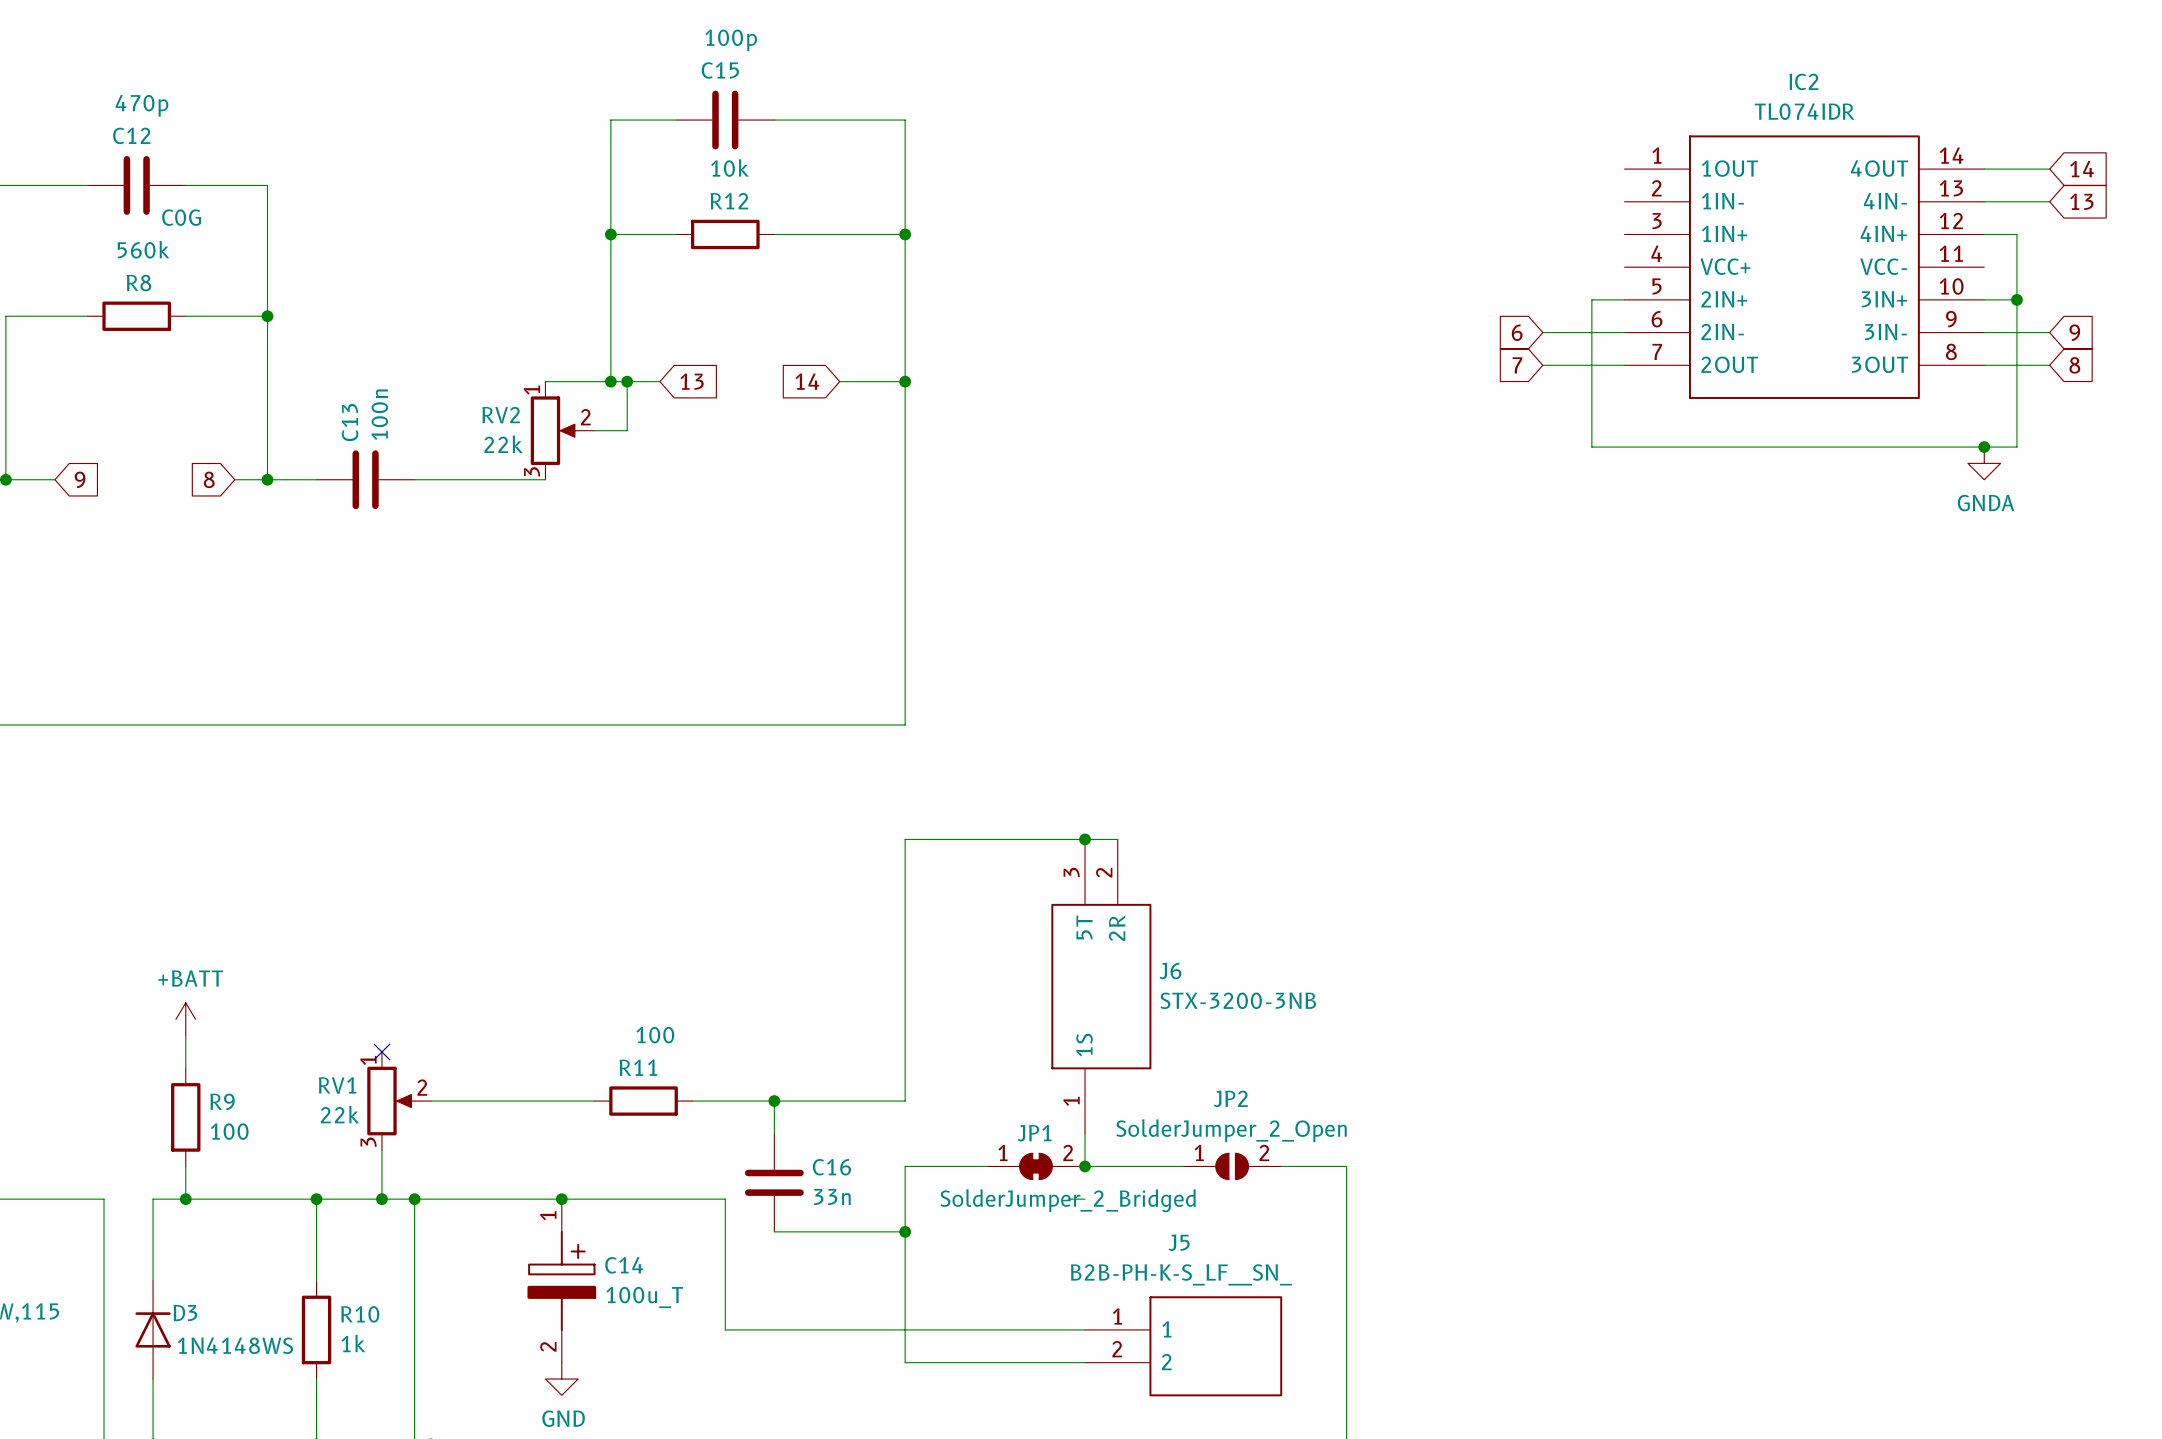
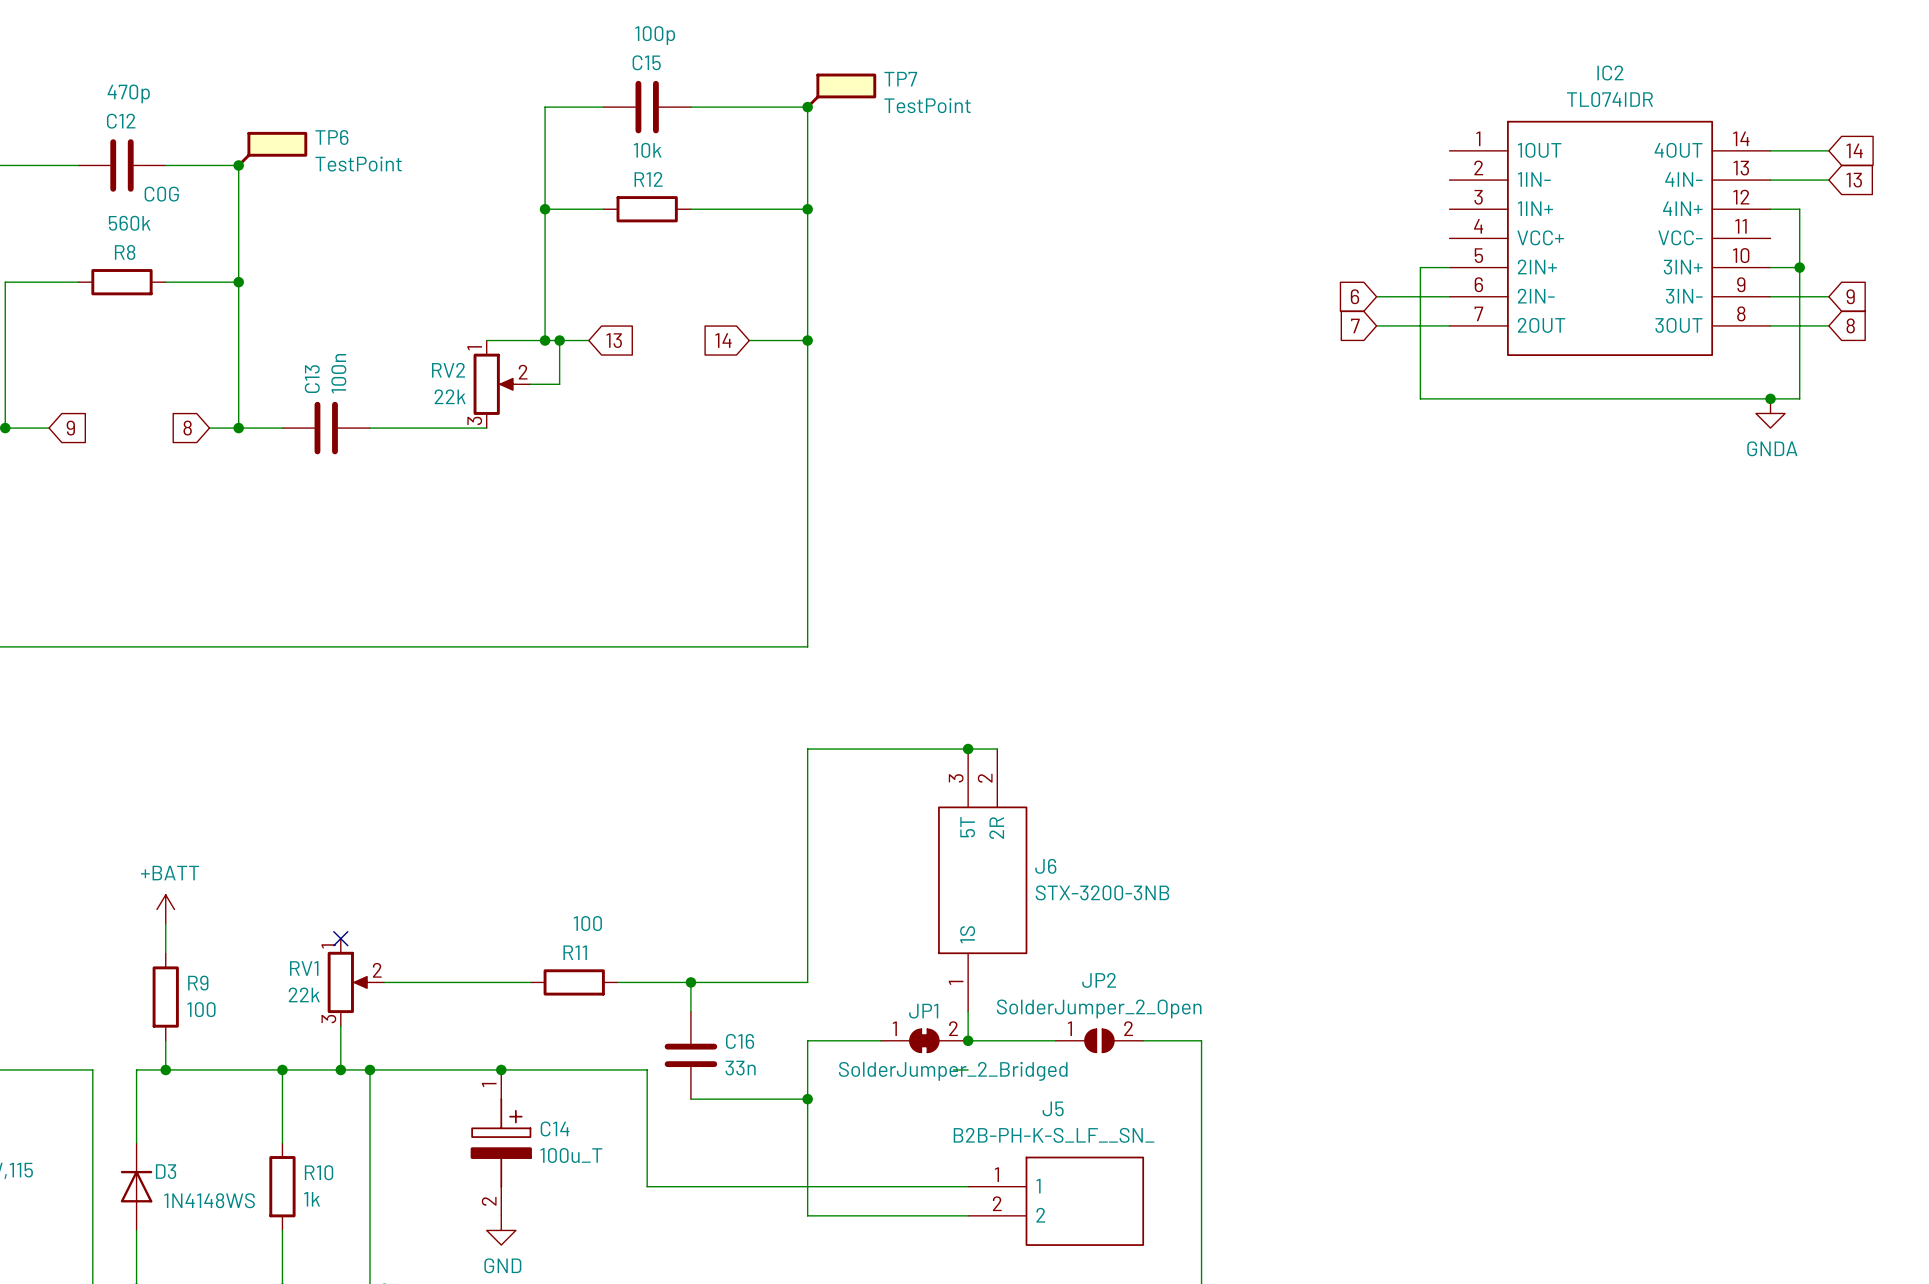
TP7: none -> TestPoint (841, 91)
junction: none -> (807, 107)
TP6: none -> TestPoint (272, 149)
junction: none -> (238, 165)

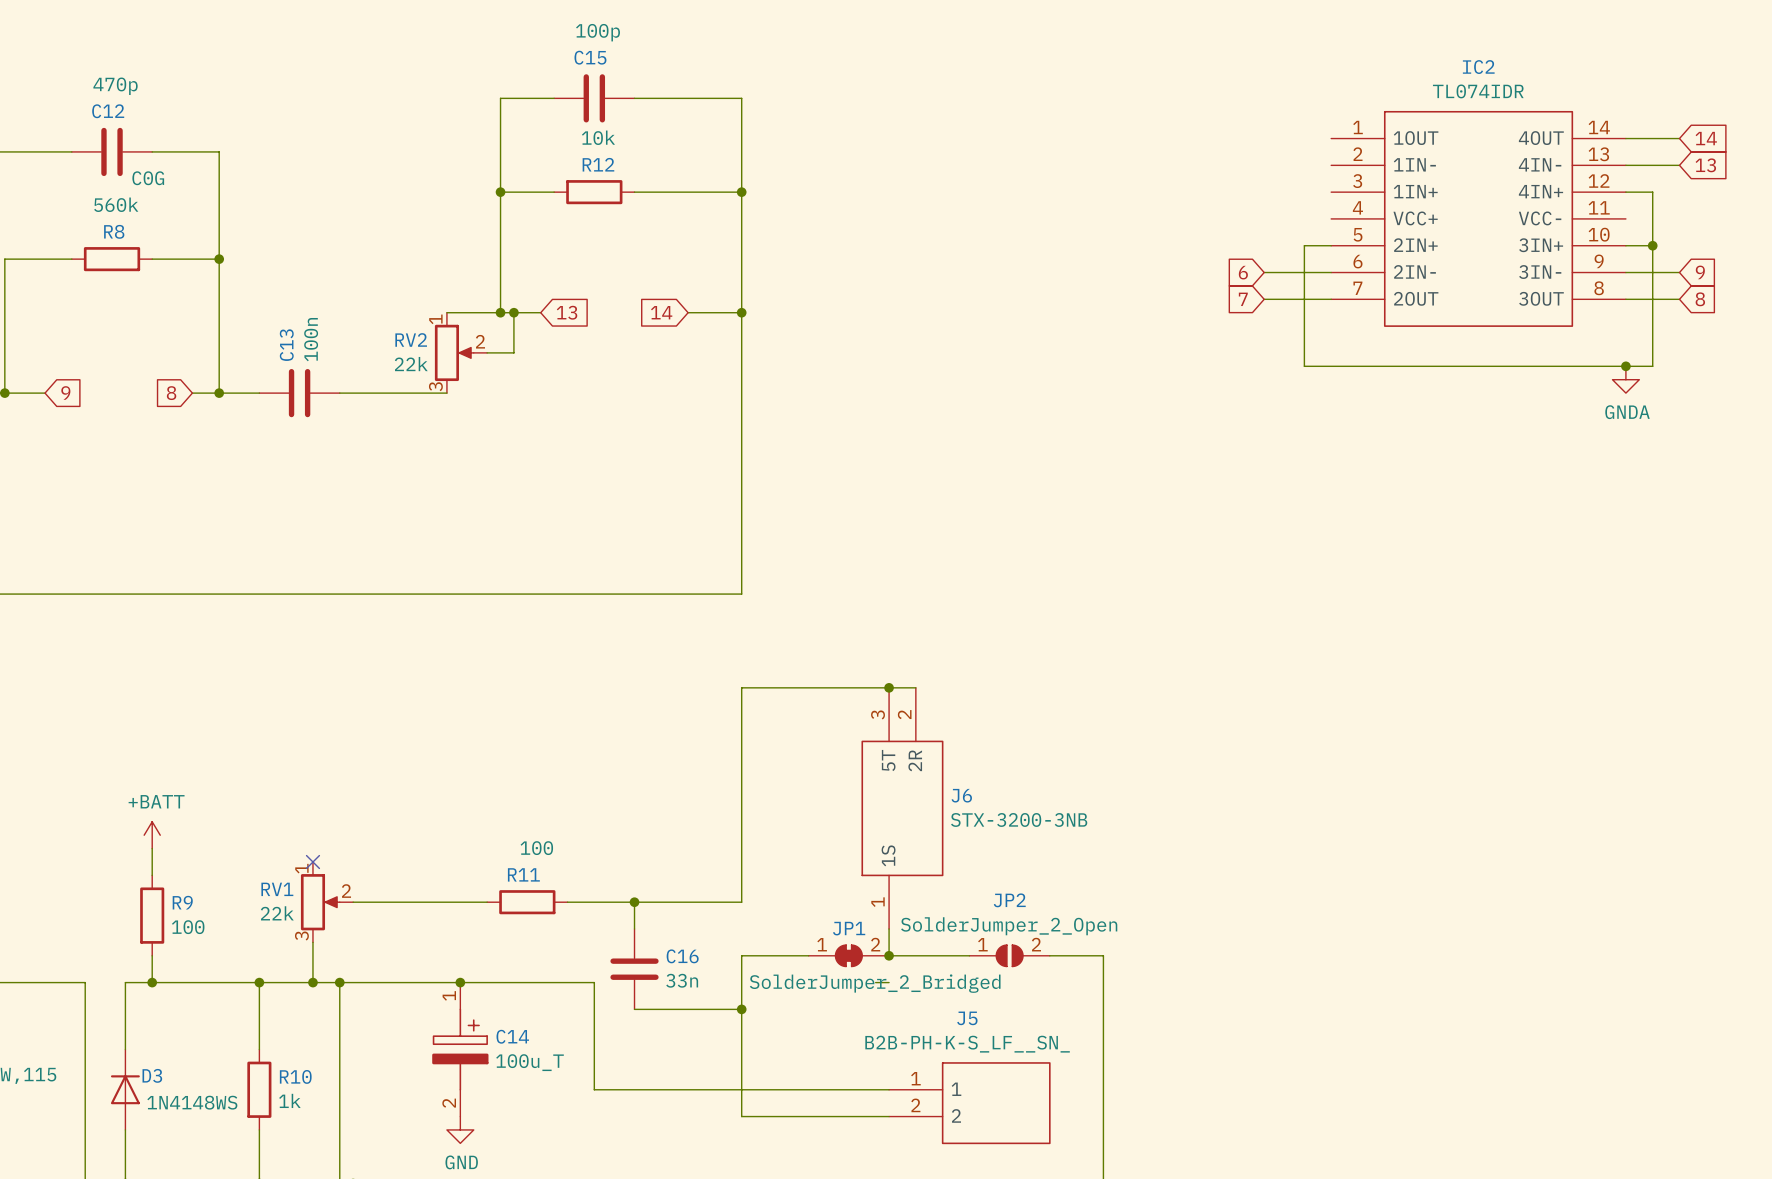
TP7: TestPoint (841, 91) -> none
junction: (807, 107) -> none
TP6: TestPoint (272, 149) -> none
junction: (238, 165) -> none

